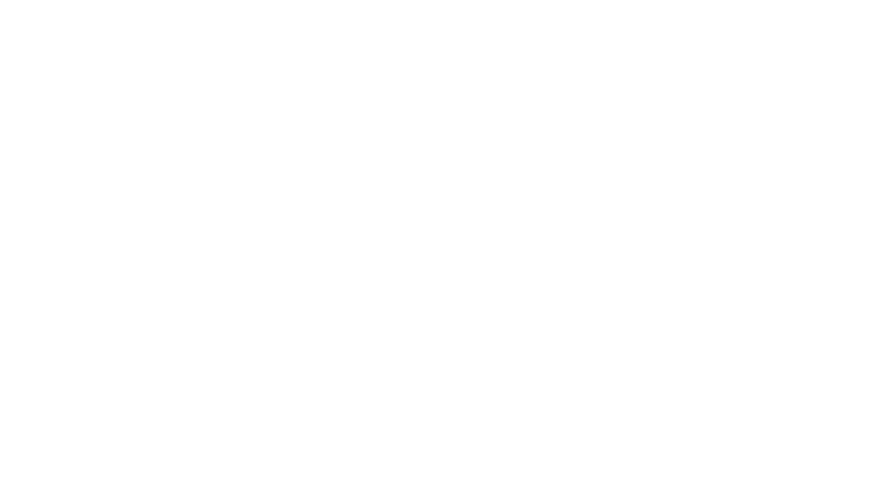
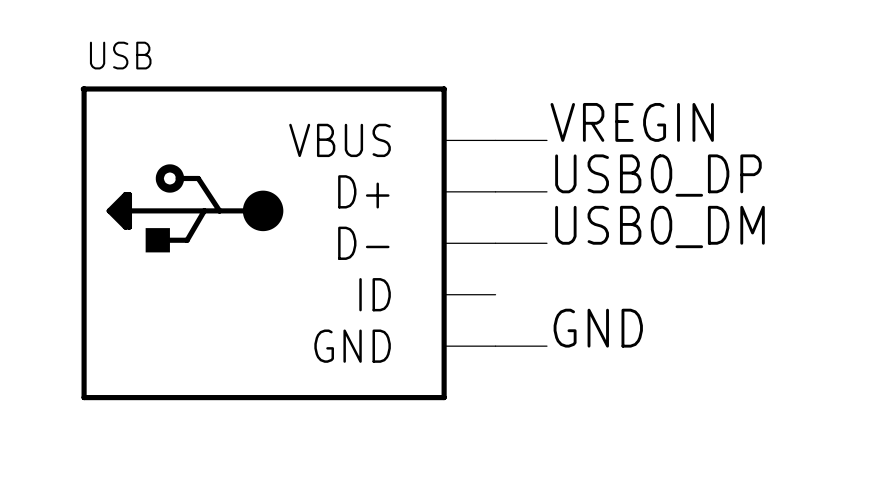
label: none -> VREGIN (632, 122)
wire: none -> (495, 140) (546, 140)
label: none -> USB0_DP (658, 175)
wire: none -> (495, 191) (546, 191)
label: none -> USB0_DM (659, 227)
USB: none -> (288, 243)
wire: none -> (495, 243) (546, 243)
label: none -> GND (598, 328)
wire: none -> (495, 346) (546, 346)

